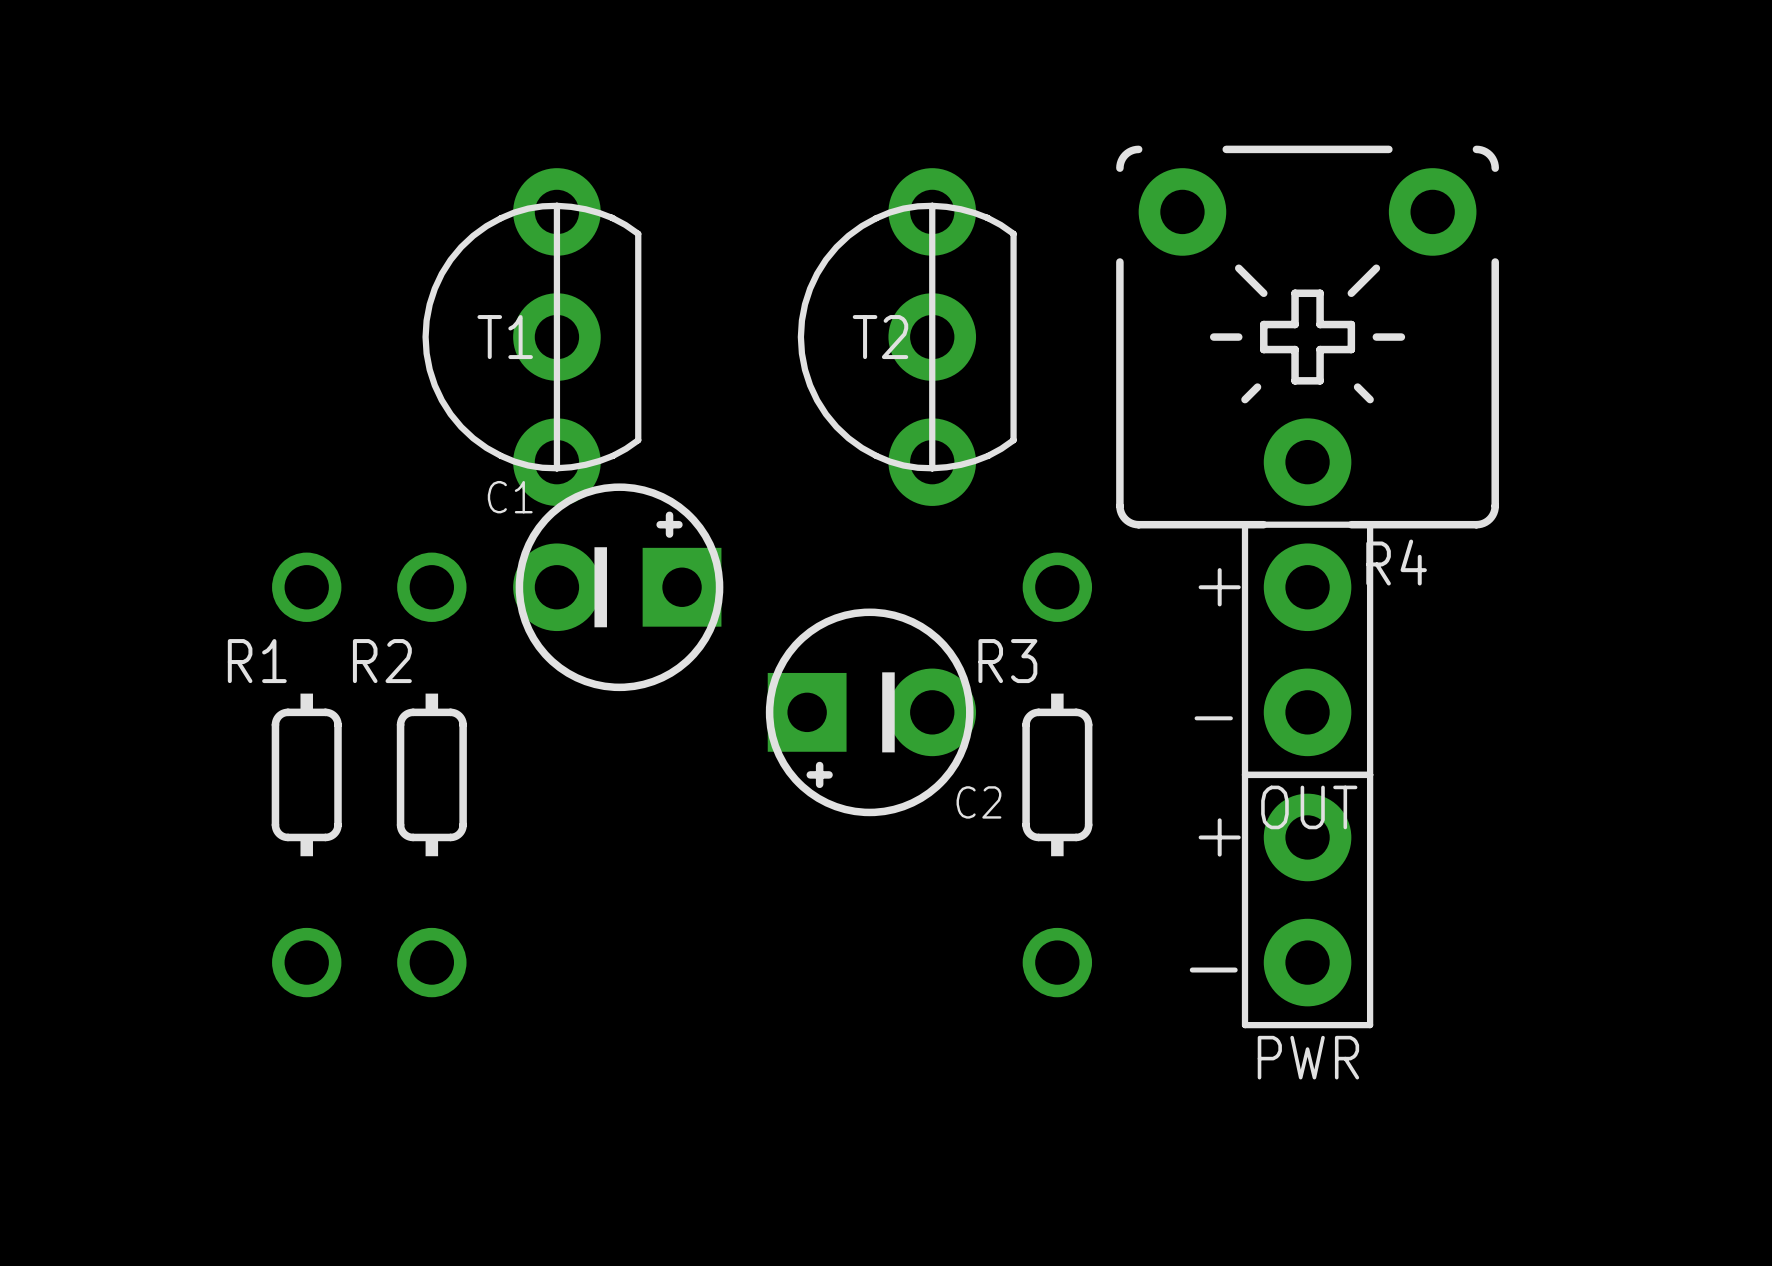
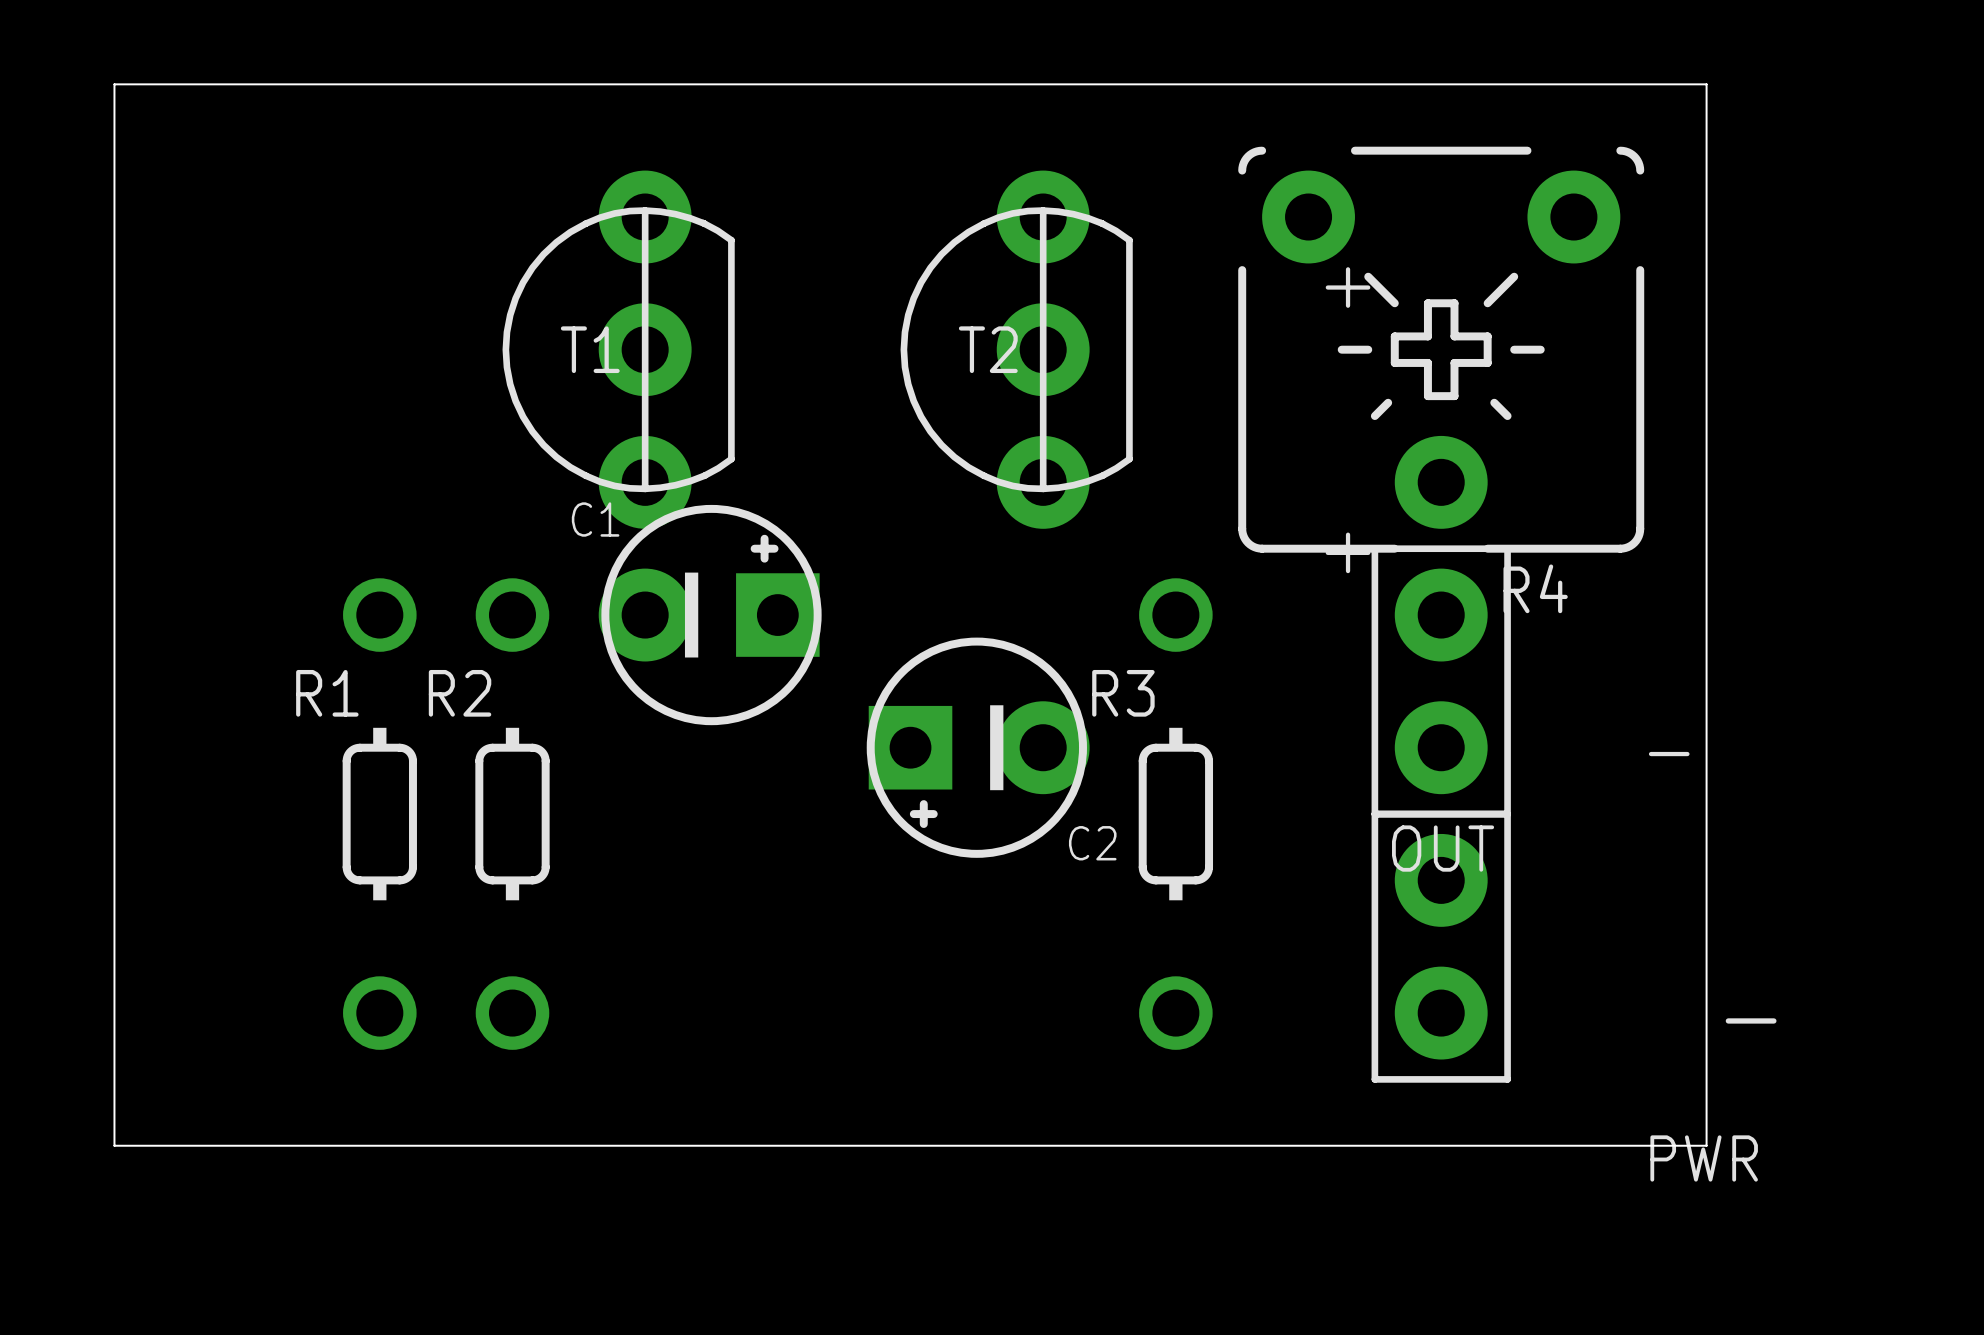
board edge: none -> (114, 84) (1706, 84) (1706, 1145) (114, 1145) (114, 84)
OUT footprint: [1241, 521, 1374, 779] -> [1371, 545, 1511, 818]
part footprint: [1241, 771, 1374, 1029] -> [1371, 810, 1511, 1083]

